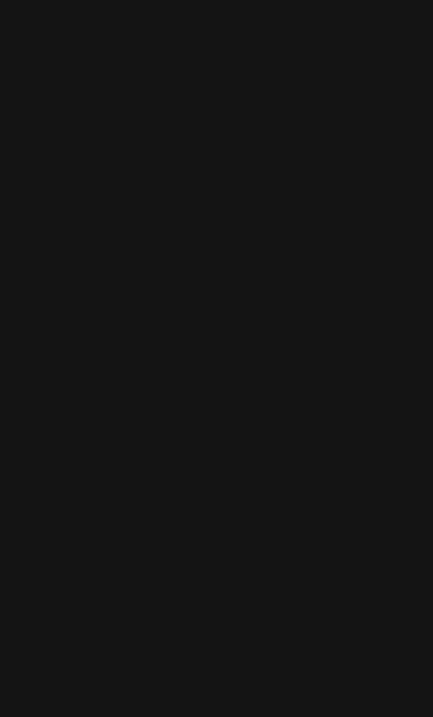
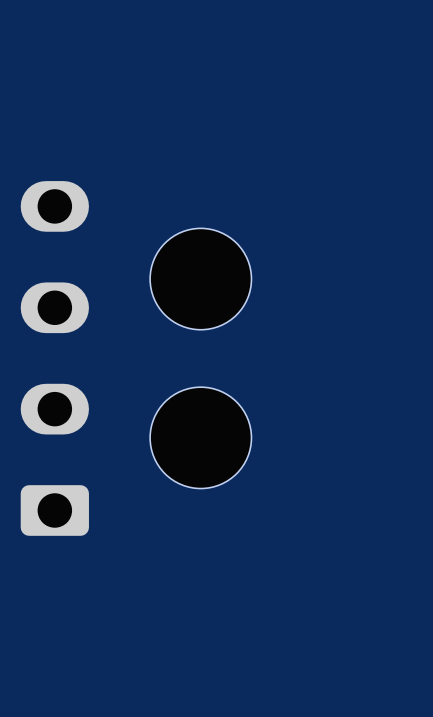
part: none -> (136, 358)

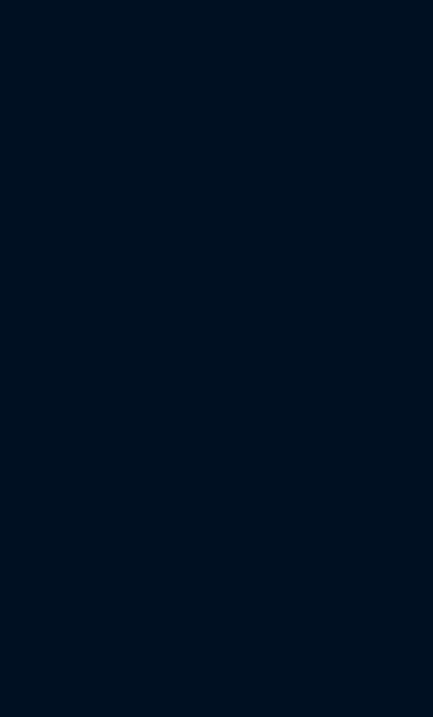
part: (136, 358) -> none

